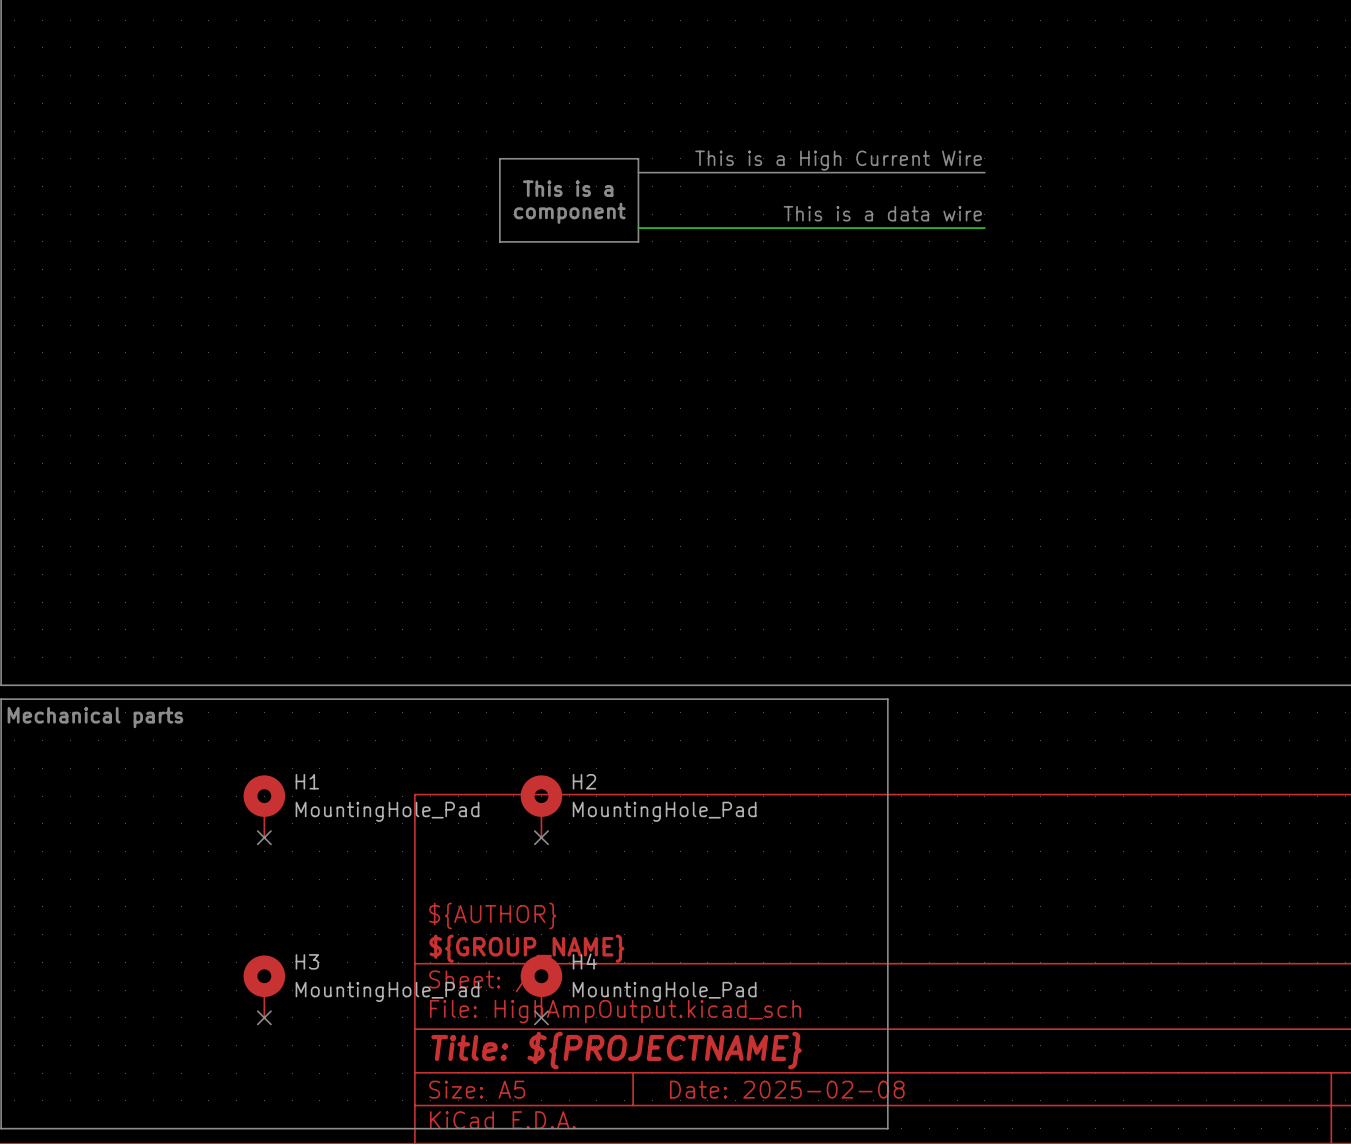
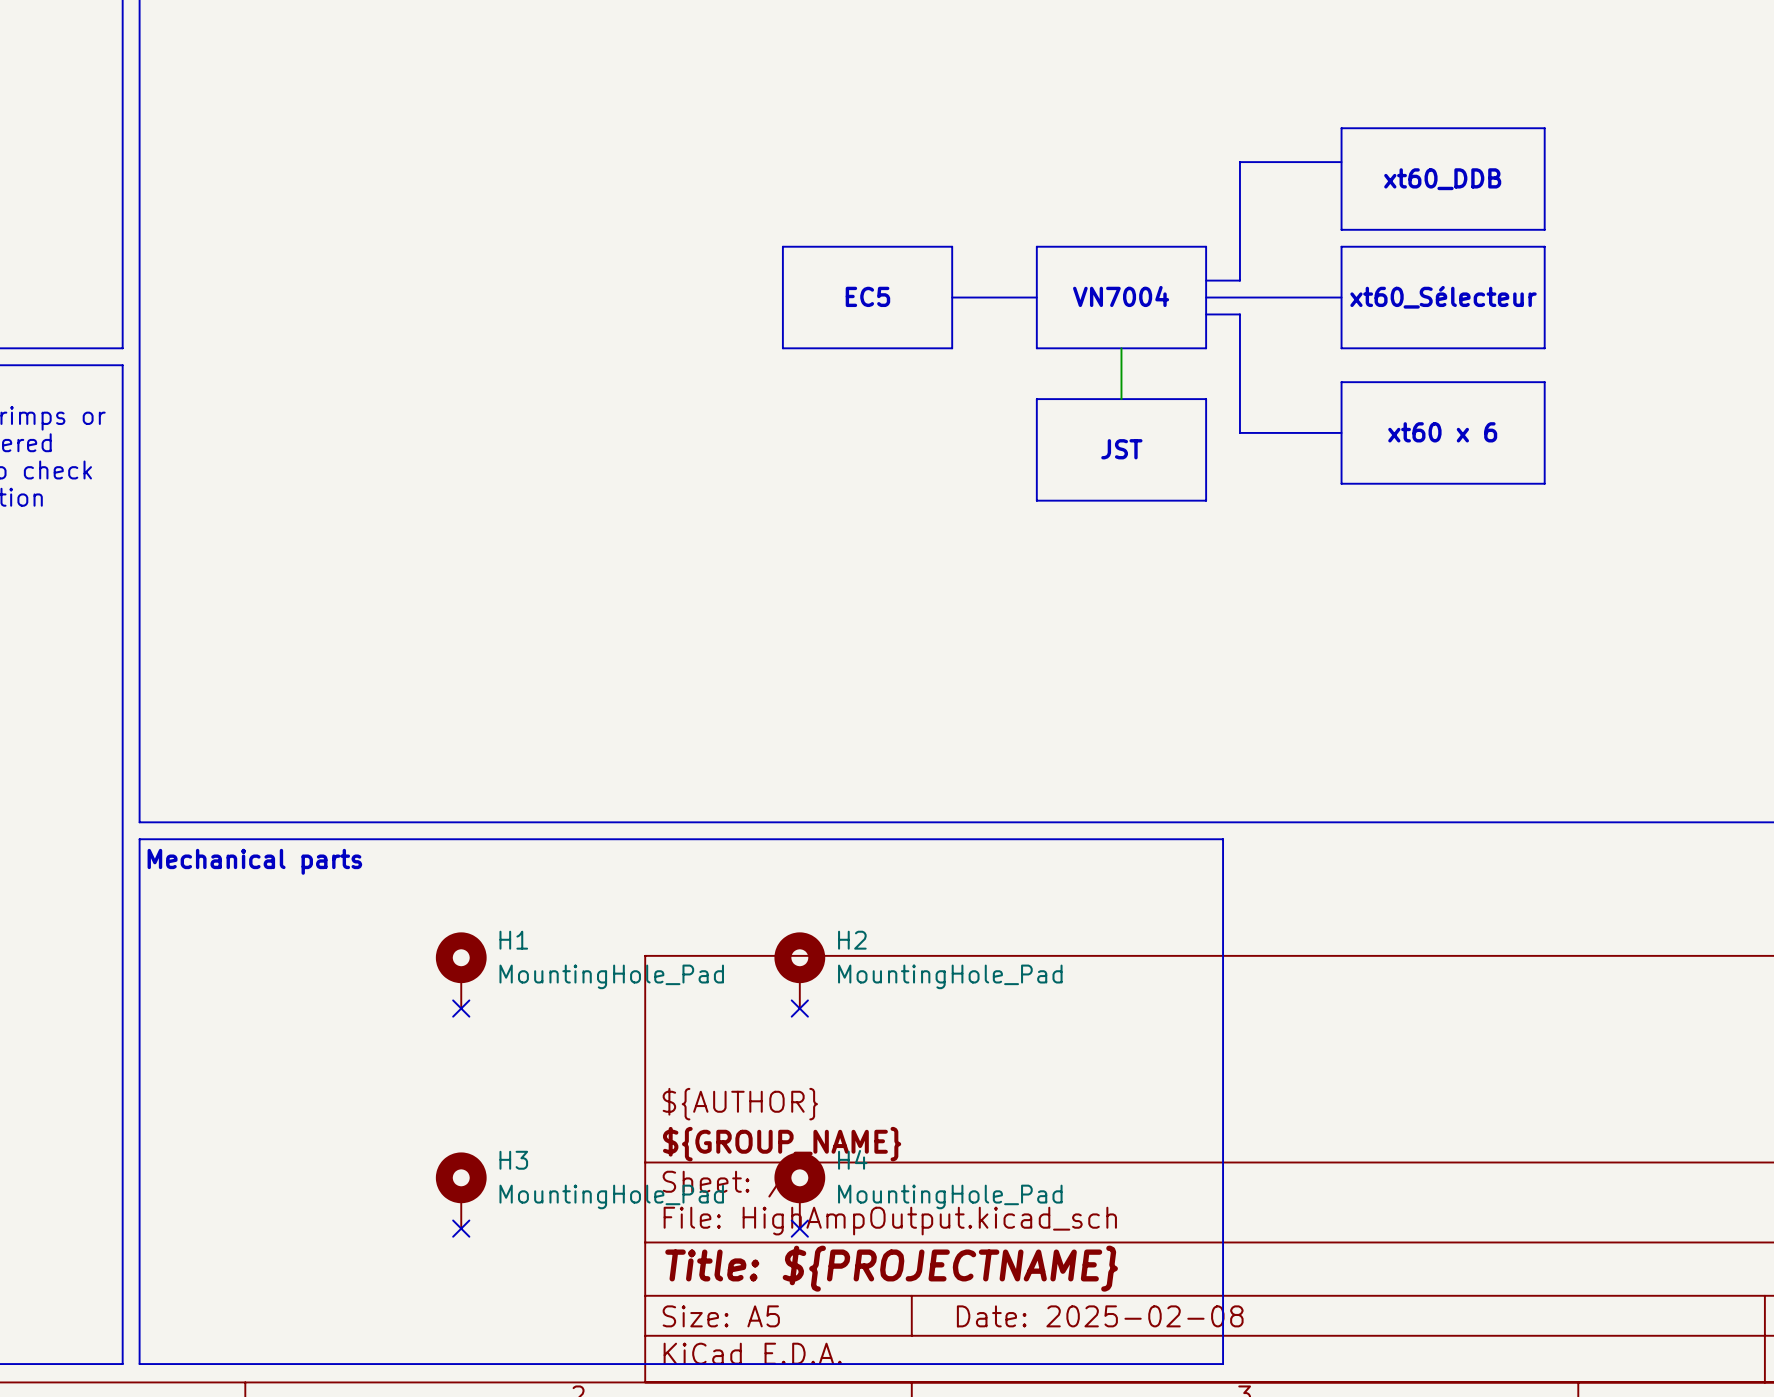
line: none -> (1341, 128) (1544, 128) (1544, 229) (1341, 229) (1341, 128)
bus: none -> (1341, 162) (1239, 162) (1239, 280) (1206, 280)
line: (499, 158) (638, 158) (638, 241) (499, 241) (499, 158) -> (782, 246) (952, 246) (952, 348) (782, 348) (782, 246)
text: none -> xt60_DDB (1442, 179)
text: This is a High Current Wire (838, 160) -> none
bus: (638, 172) (984, 172) -> none
text: This is a (568, 188) -> none
text: component (569, 213) -> none
text: This is a data wire (882, 213) -> none
line: none -> (1036, 246) (1206, 246) (1206, 348) (1036, 348) (1036, 246)
line: none -> (1341, 246) (1341, 348) (1544, 348) (1544, 246) (1341, 246)
wire: (638, 228) (984, 228) -> none
text: none -> VN7004 (1121, 296)
text: none -> EC5 (867, 296)
bus: none -> (952, 297) (1036, 297)
bus: none -> (1206, 297) (1341, 297)
text: none -> xt60_Sélecteur (1443, 297)
bus: none -> (1206, 314) (1239, 314) (1239, 432) (1341, 432)
wire: none -> (1121, 348) (1121, 399)
line: none -> (1341, 382) (1341, 483) (1544, 483) (1544, 382) (1341, 382)
line: none -> (1036, 399) (1206, 399) (1206, 500) (1036, 500) (1036, 399)
text: none -> xt60 x 6 (1442, 432)
text: none -> JST (1121, 449)

